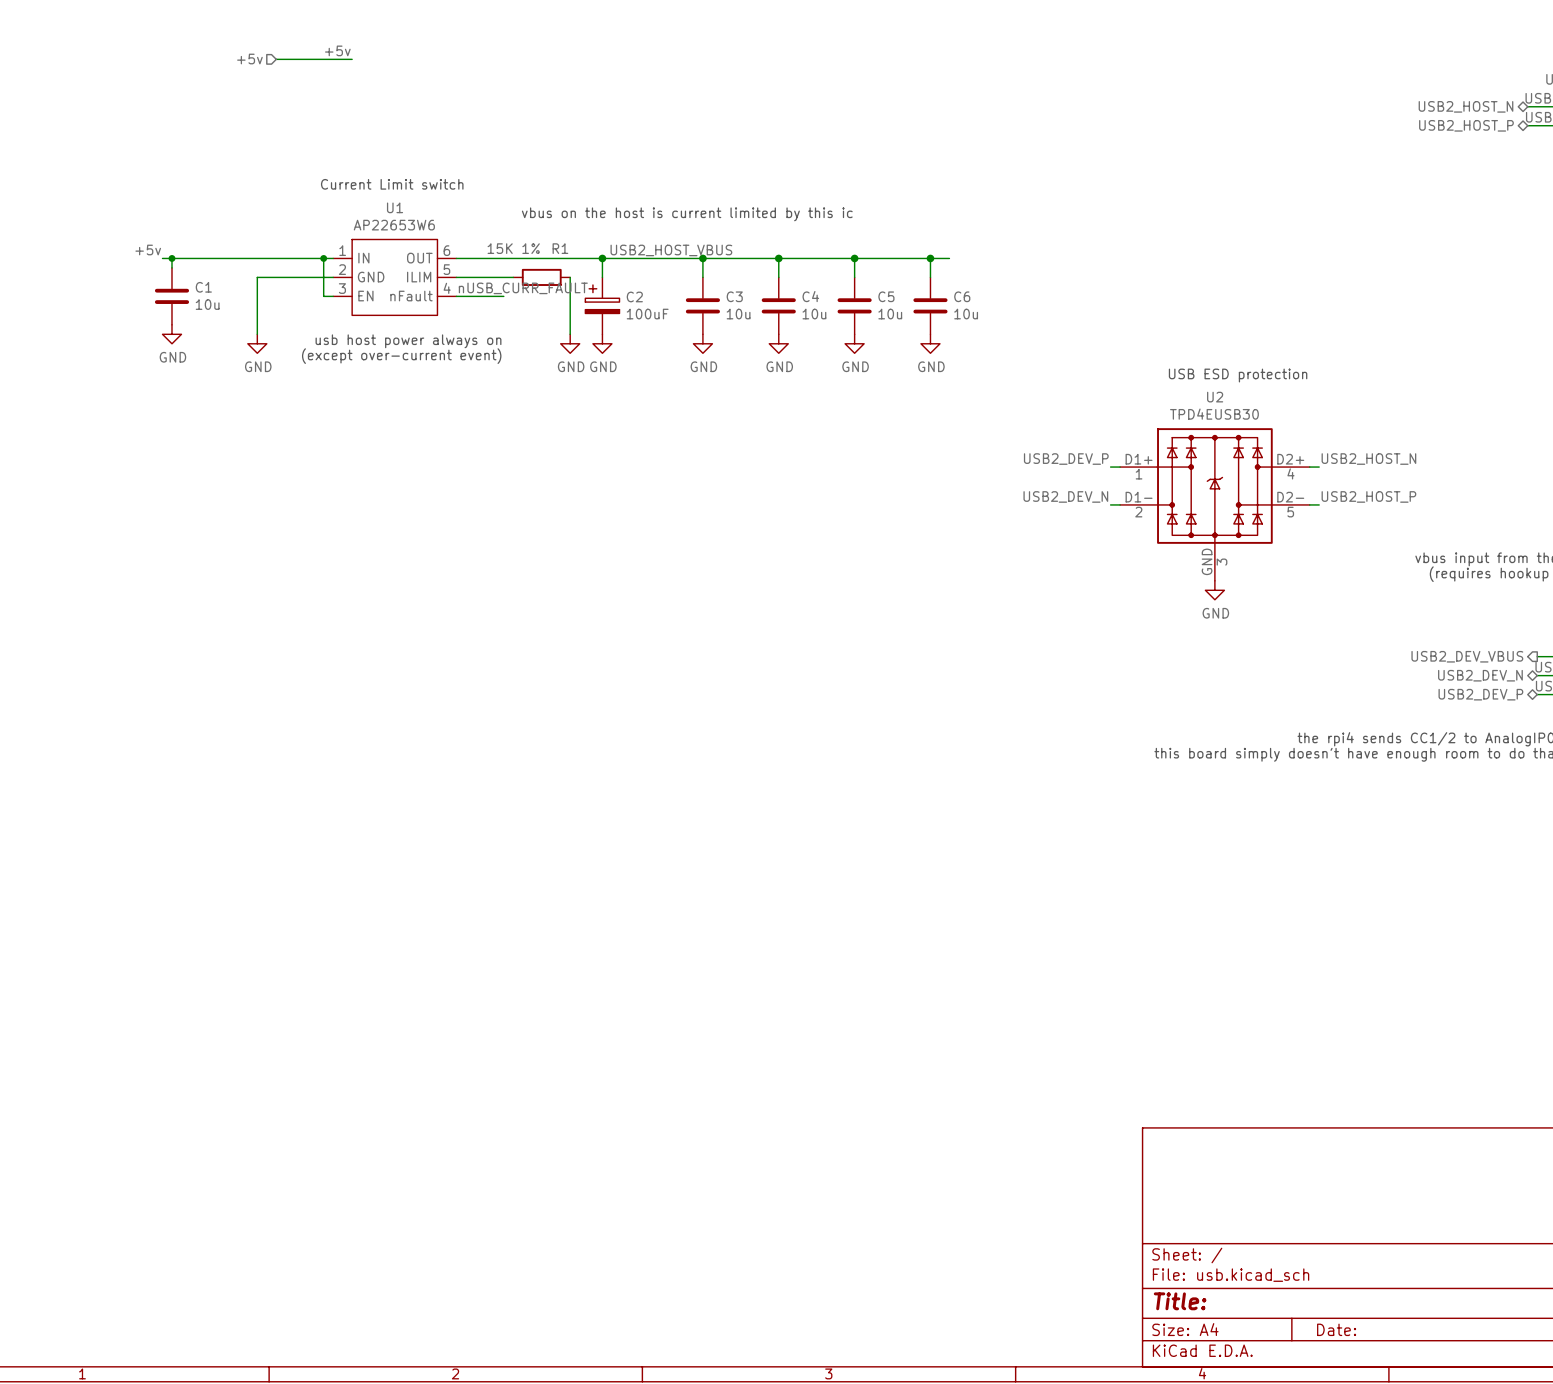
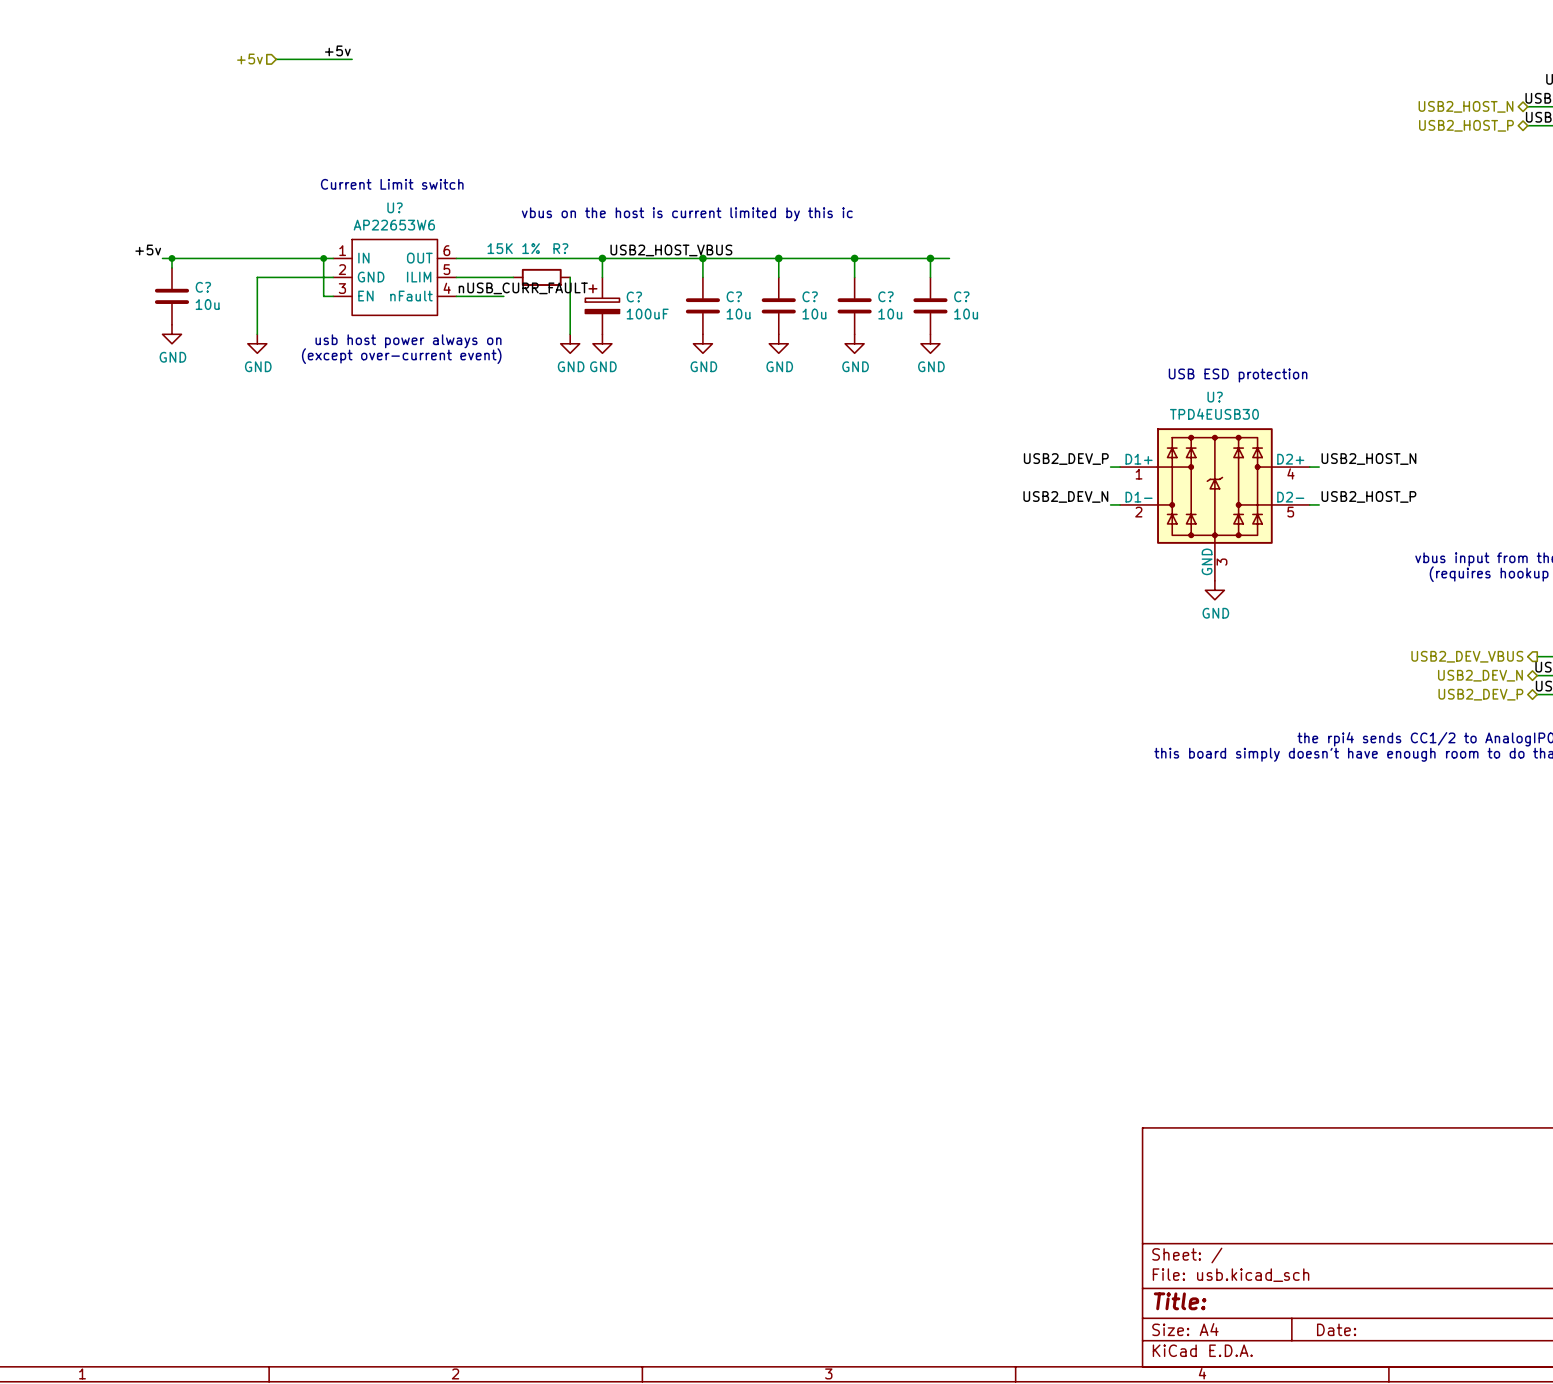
U1 name: U1 (395, 207) -> U? (395, 207)
R1 name: R1 (560, 248) -> R? (560, 248)
C1 name: C1 (203, 287) -> C? (203, 287)
C2 name: C2 (634, 296) -> C? (634, 296)
C3 name: C3 (734, 296) -> C? (734, 296)
C4 name: C4 (810, 296) -> C? (810, 296)
C5 name: C5 (886, 296) -> C? (885, 296)
C6 name: C6 (962, 296) -> C? (961, 296)
U2 name: U2 (1215, 397) -> U? (1215, 397)

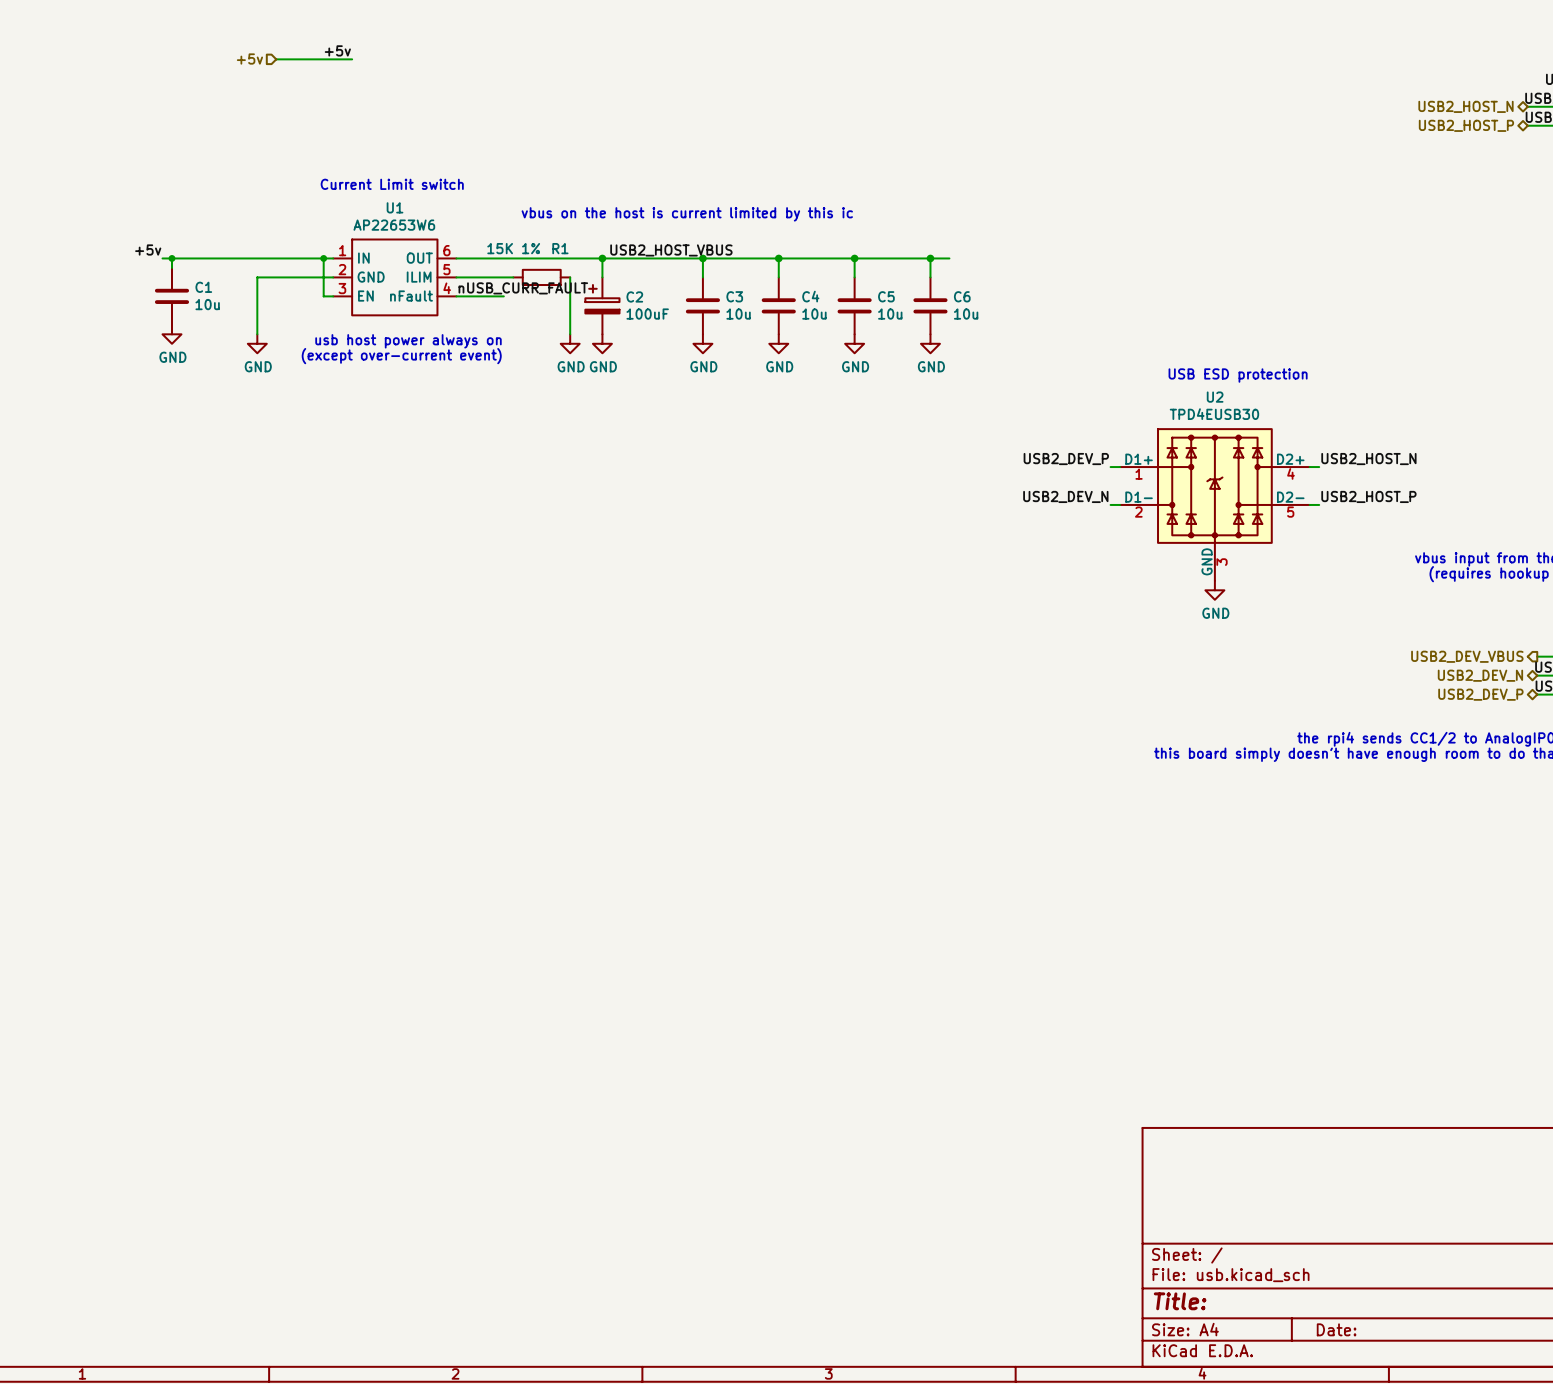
U? name: U? (395, 207) -> U1 (395, 207)
R? name: R? (560, 248) -> R1 (560, 248)
C? name: C? (203, 287) -> C1 (203, 287)
C? name: C? (634, 296) -> C2 (634, 296)
C? name: C? (734, 296) -> C3 (734, 296)
C? name: C? (810, 296) -> C4 (810, 296)
C? name: C? (885, 296) -> C5 (886, 296)
C? name: C? (961, 296) -> C6 (962, 296)
U? name: U? (1215, 397) -> U2 (1215, 397)

